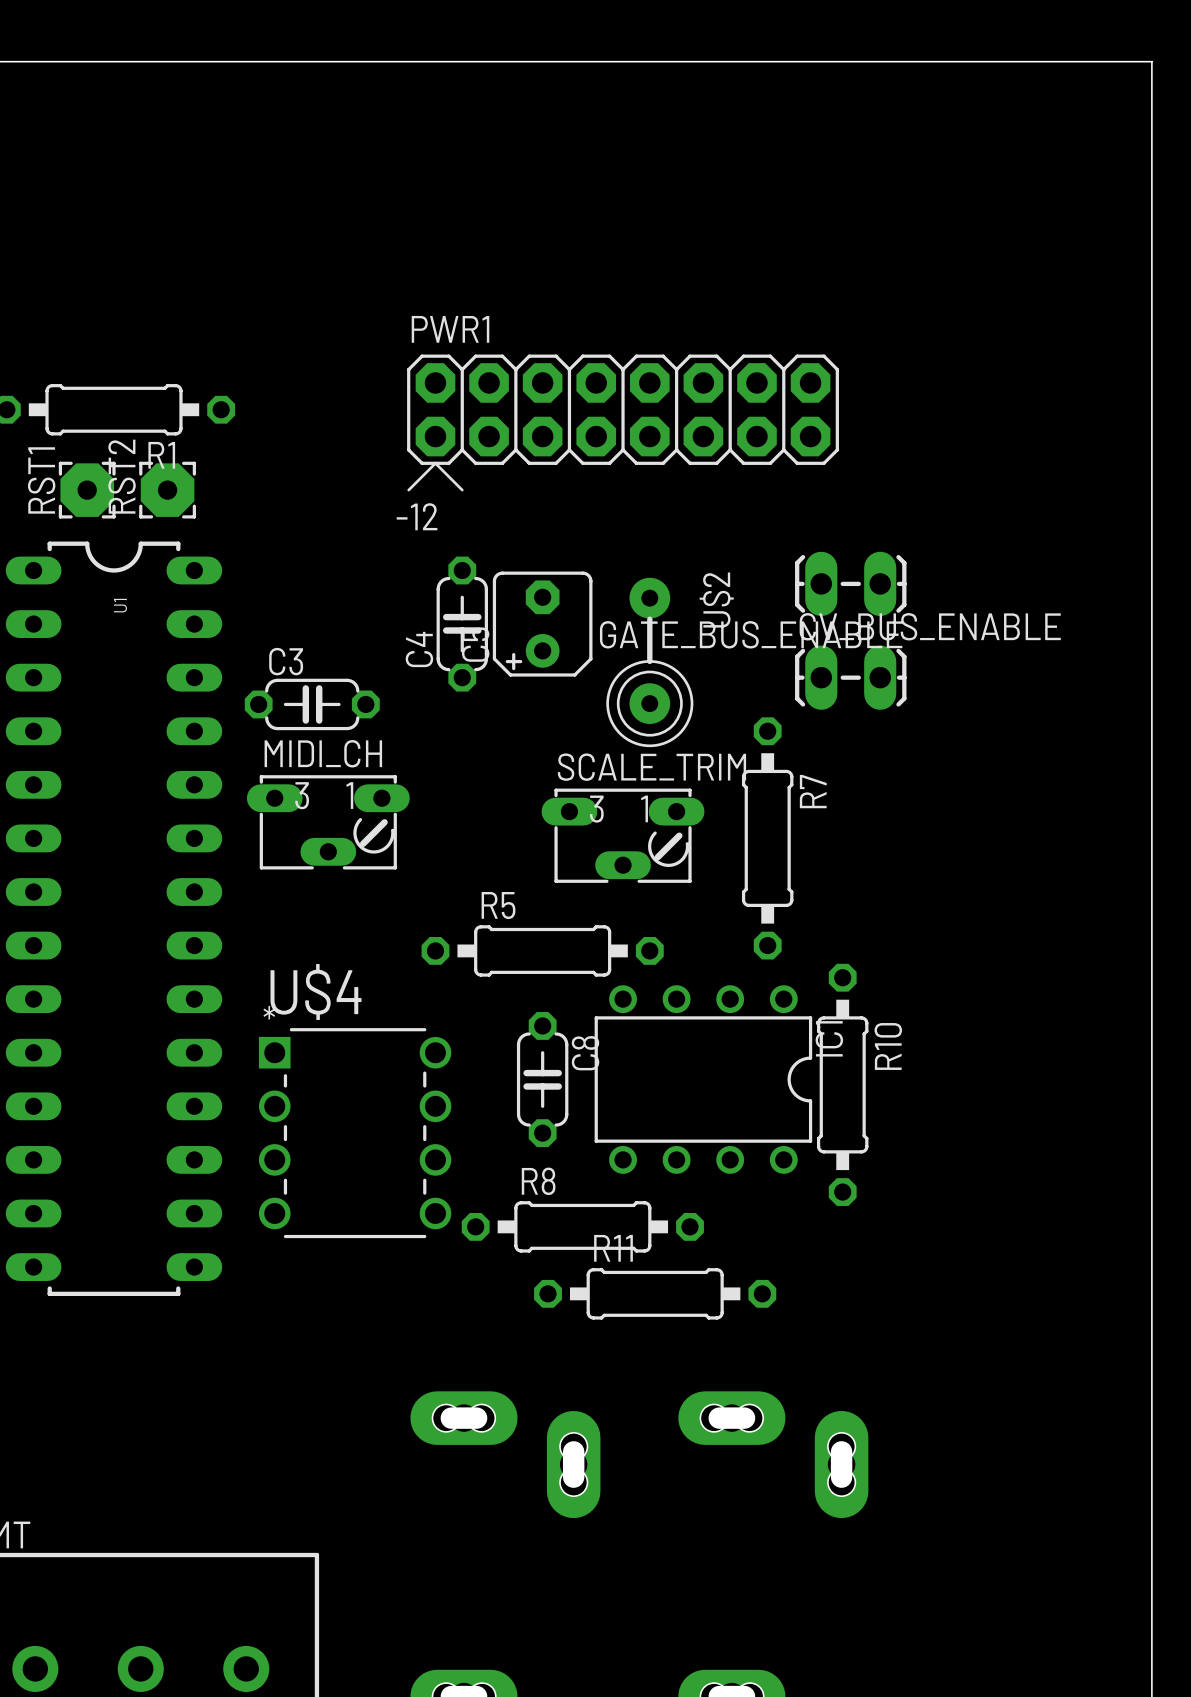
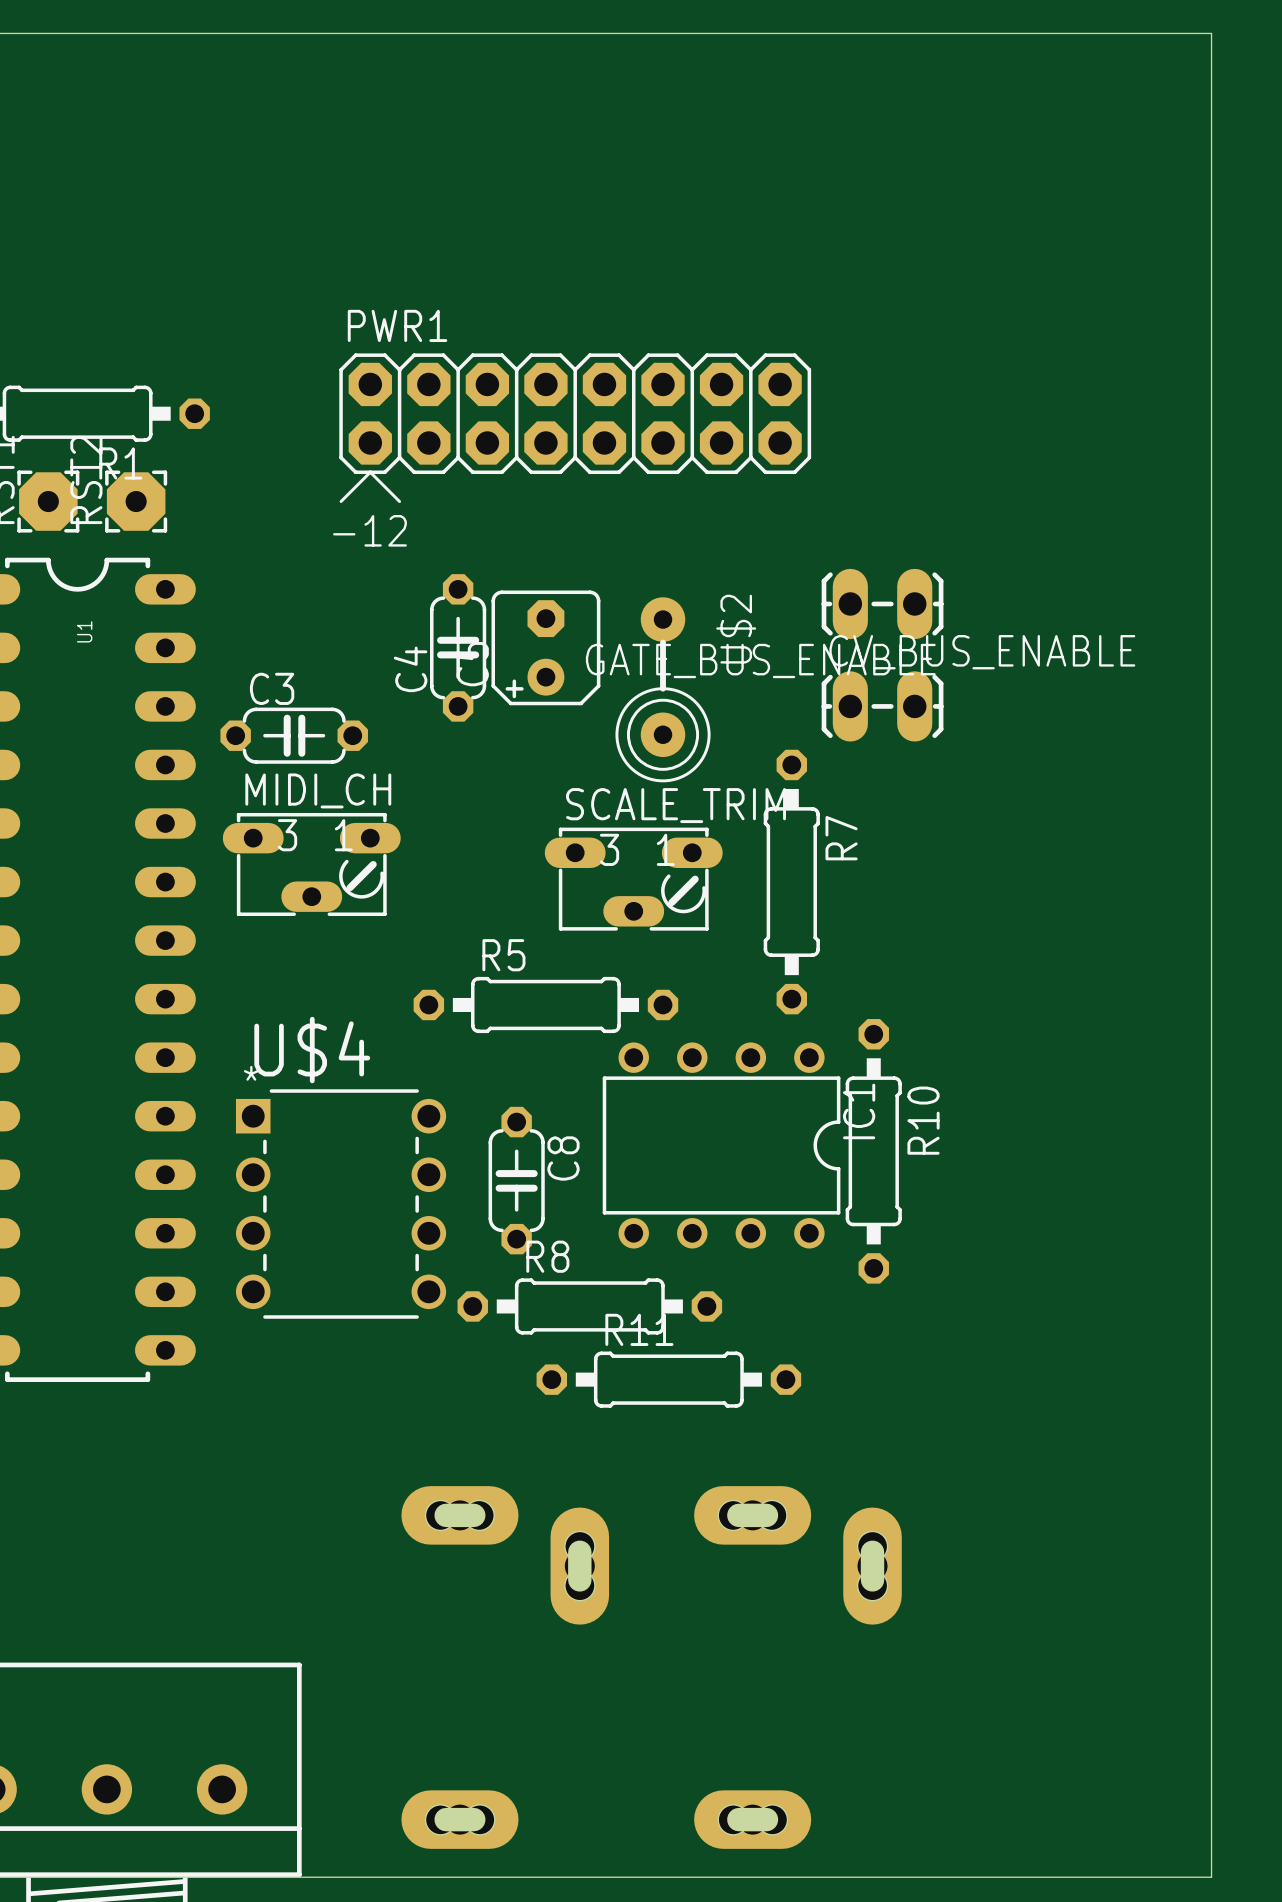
PWR1 position: (623, 423) -> (575, 428)
C8 position: (542, 1079) -> (516, 1180)

